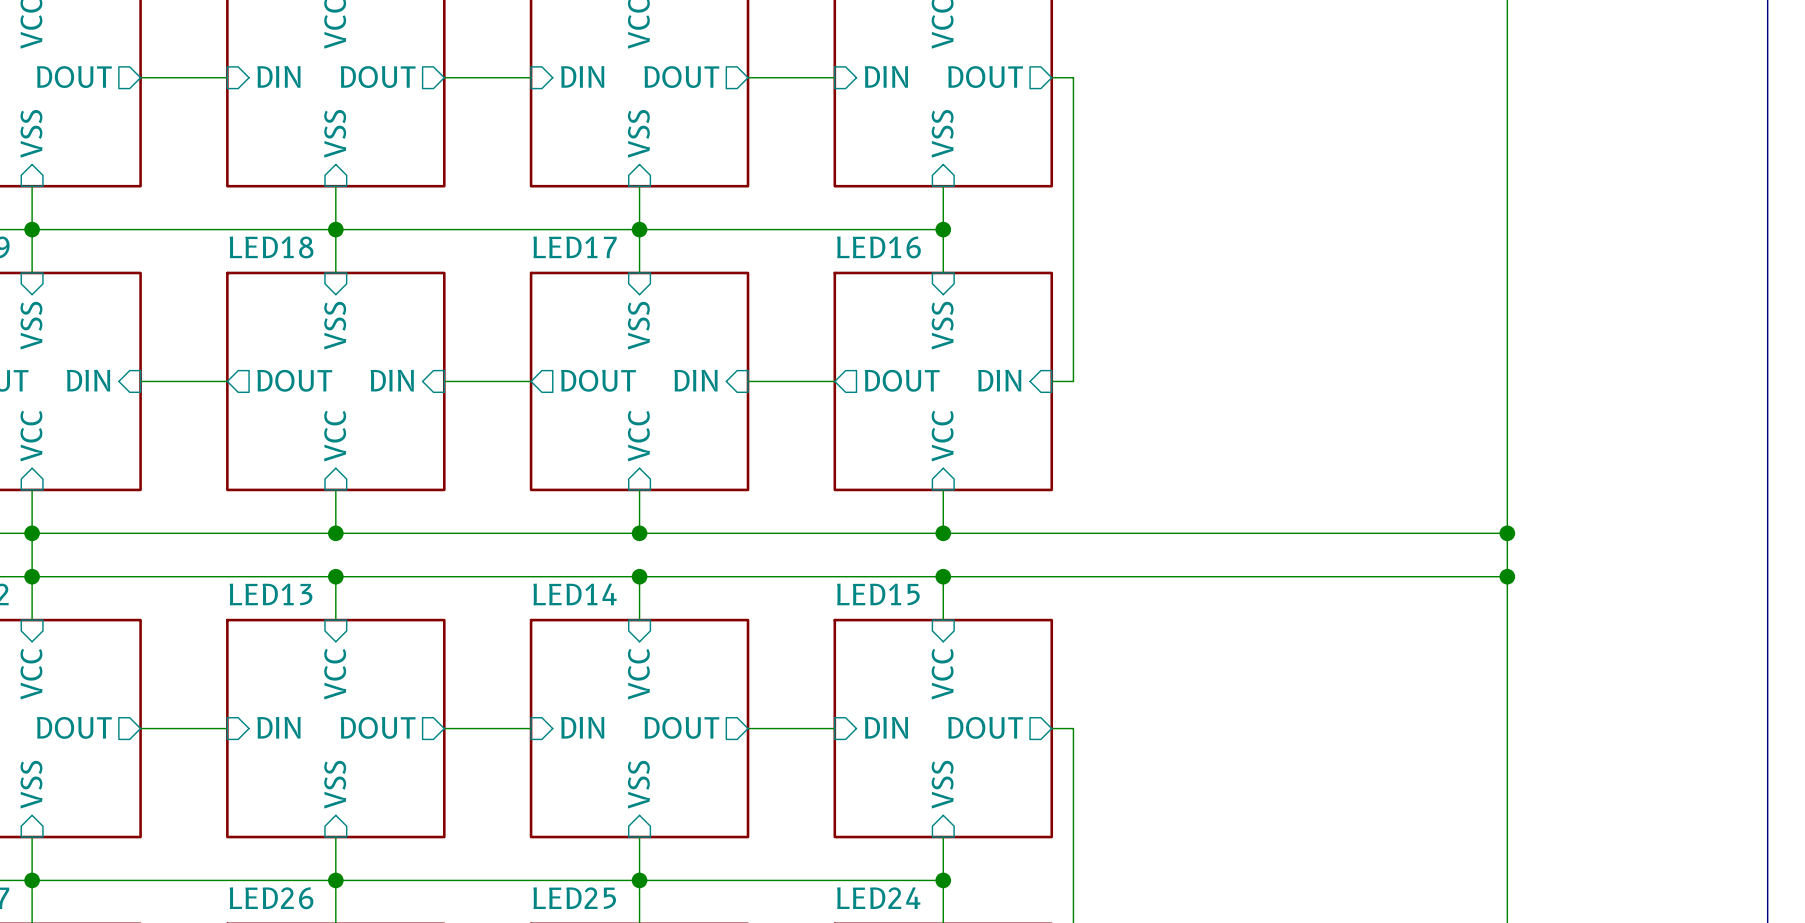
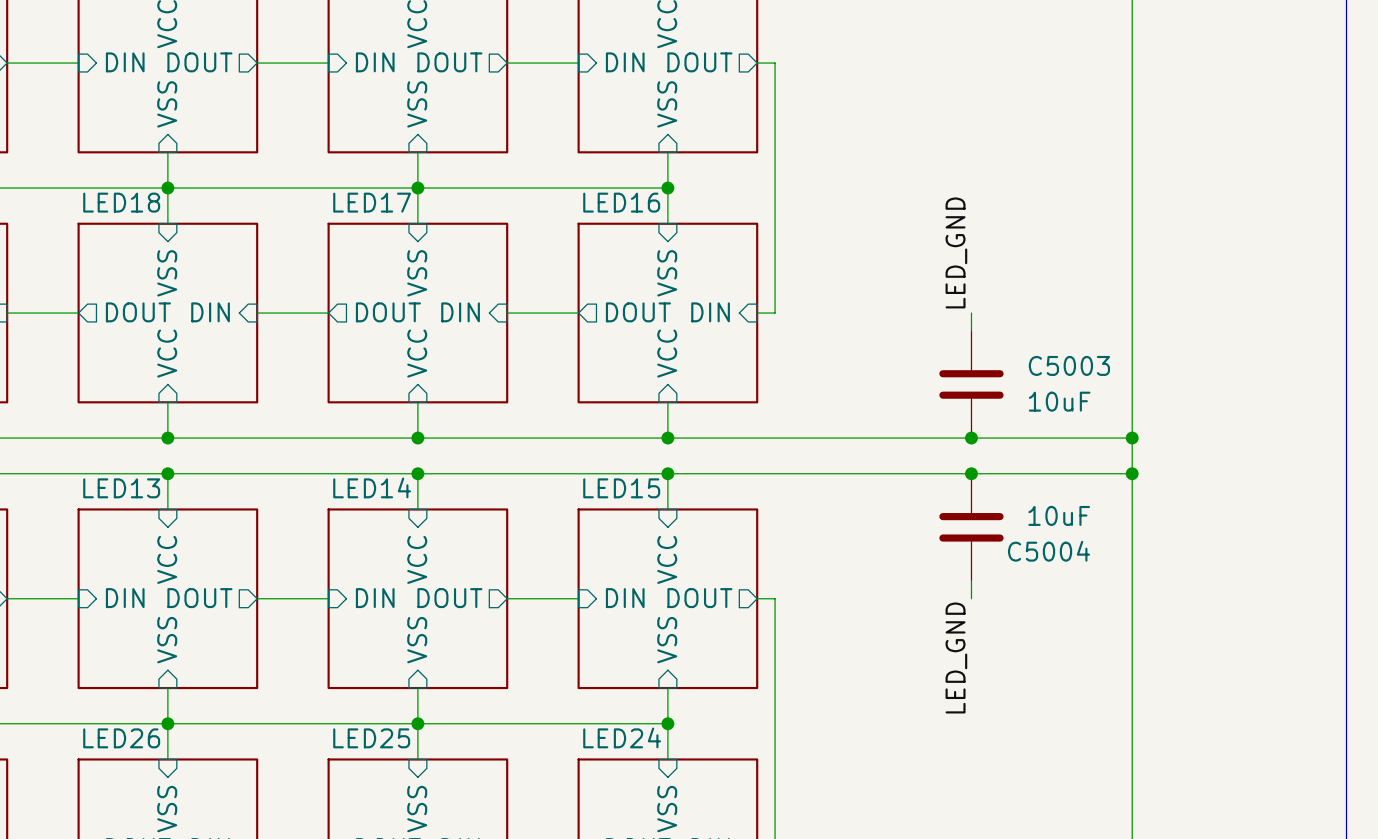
label: none -> LED_GND (956, 252)
wire: none -> (971, 313) (971, 330)
C5003: none -> 10uF (971, 384)
junction: none -> (971, 438)
junction: none -> (971, 473)
C5004: none -> 10uF (971, 527)
wire: none -> (971, 580) (971, 598)
label: none -> LED_GND (956, 657)

